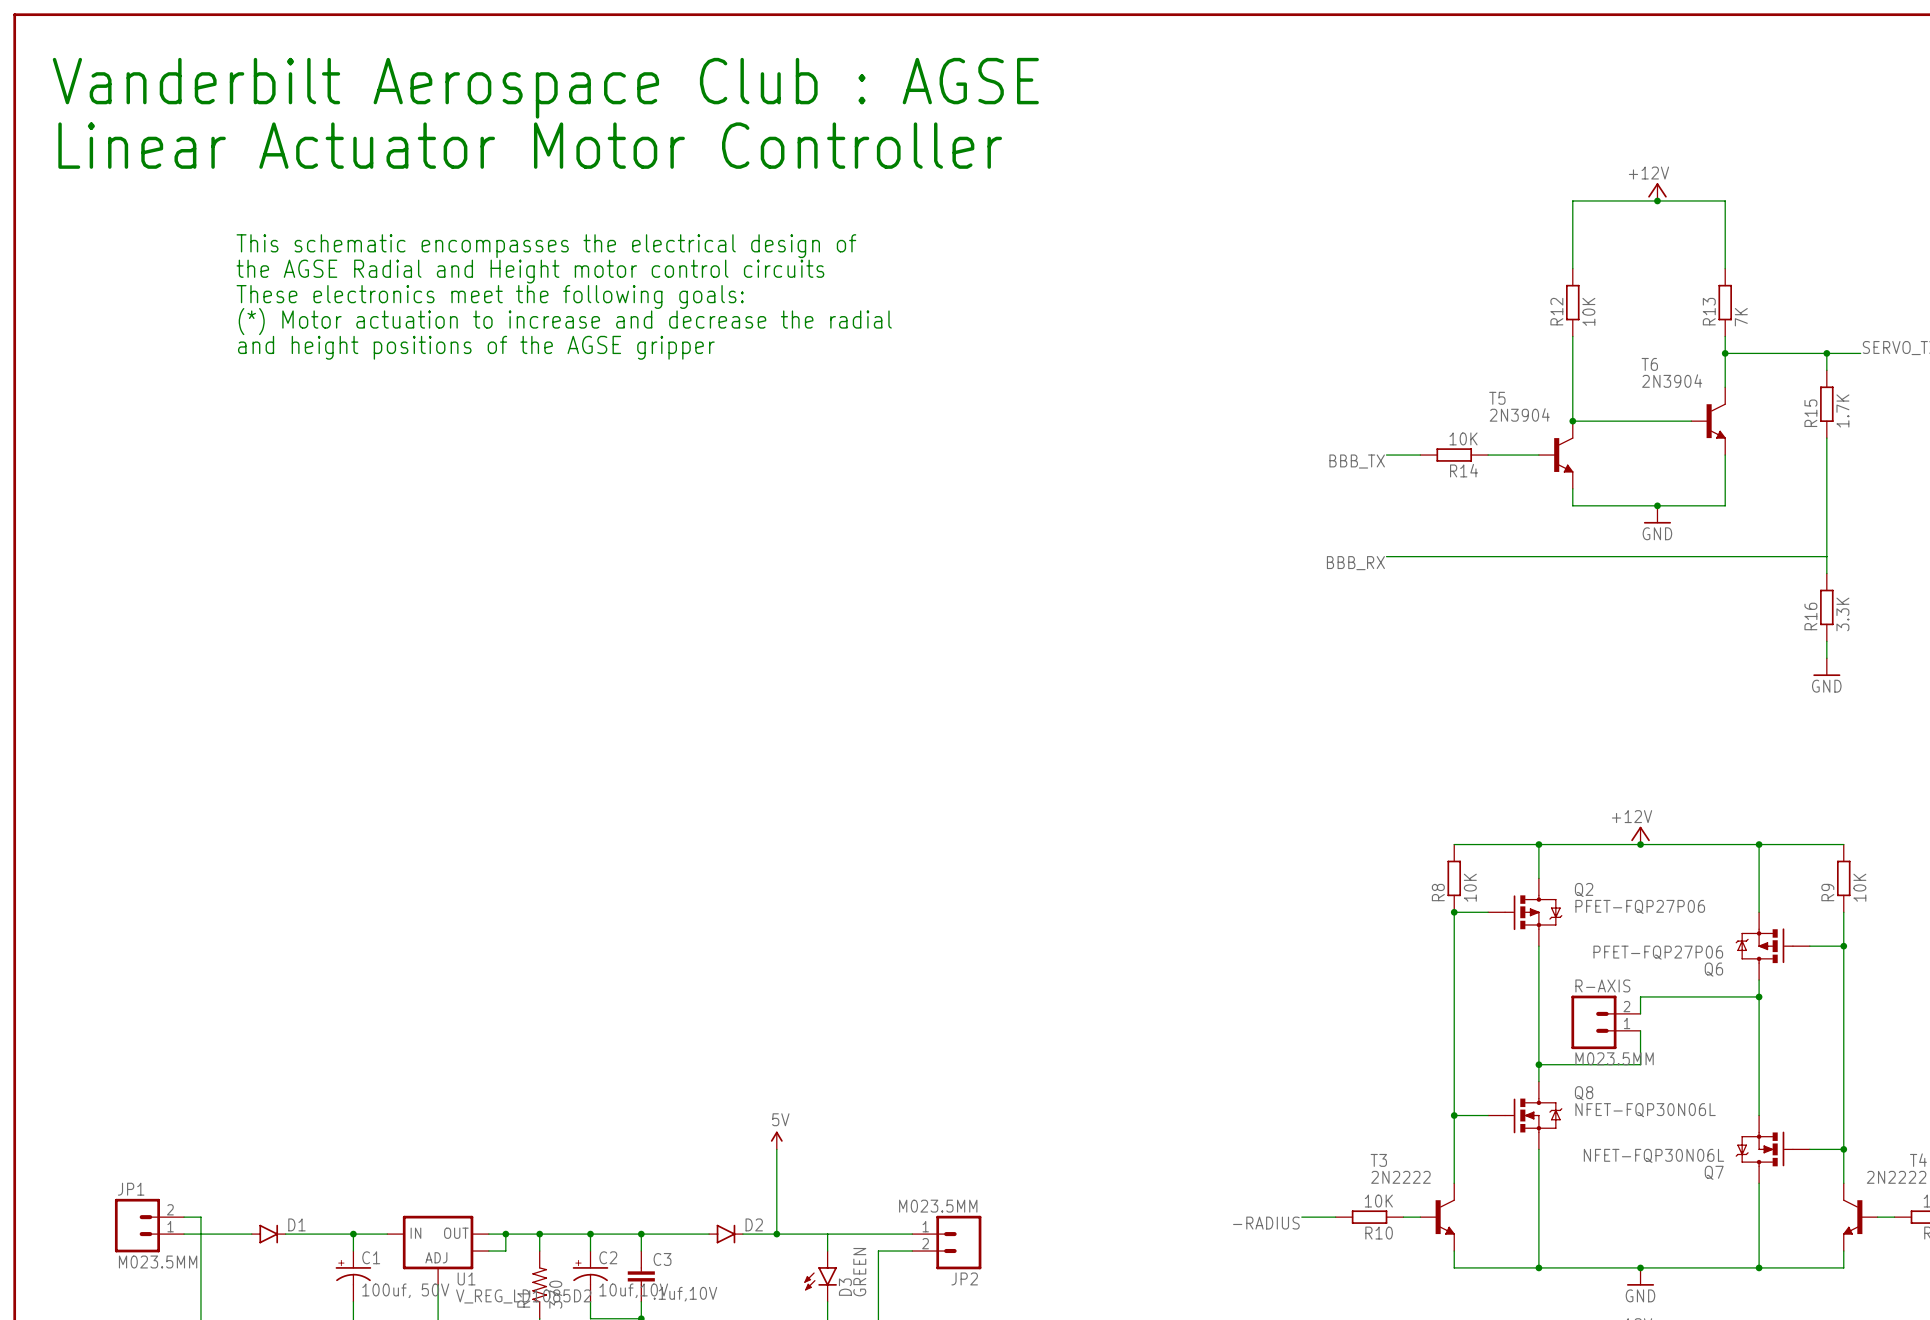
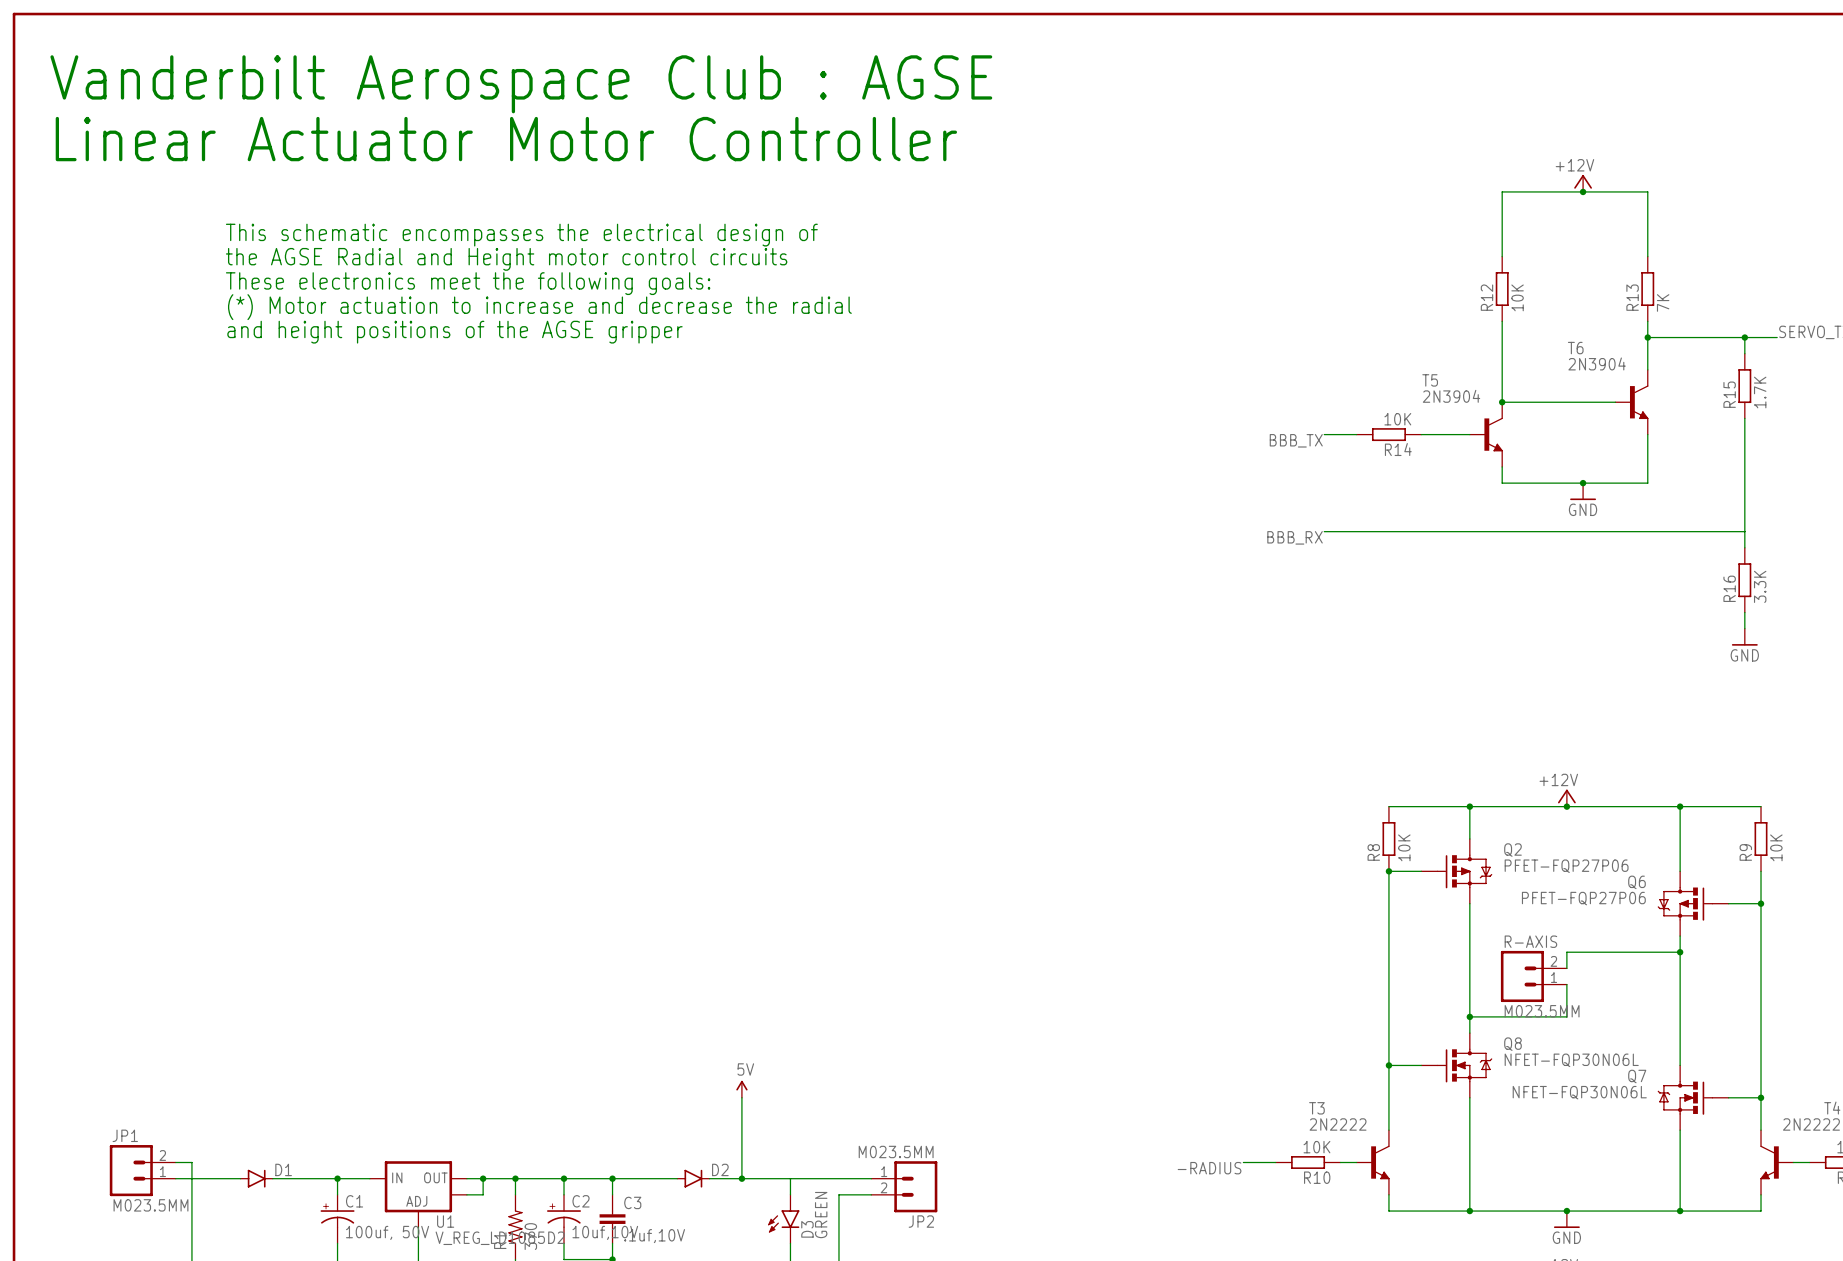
Q6 flip: as is (1764, 945) -> up-down (1685, 903)
Q7 flip: as is (1764, 1149) -> up-down (1685, 1097)

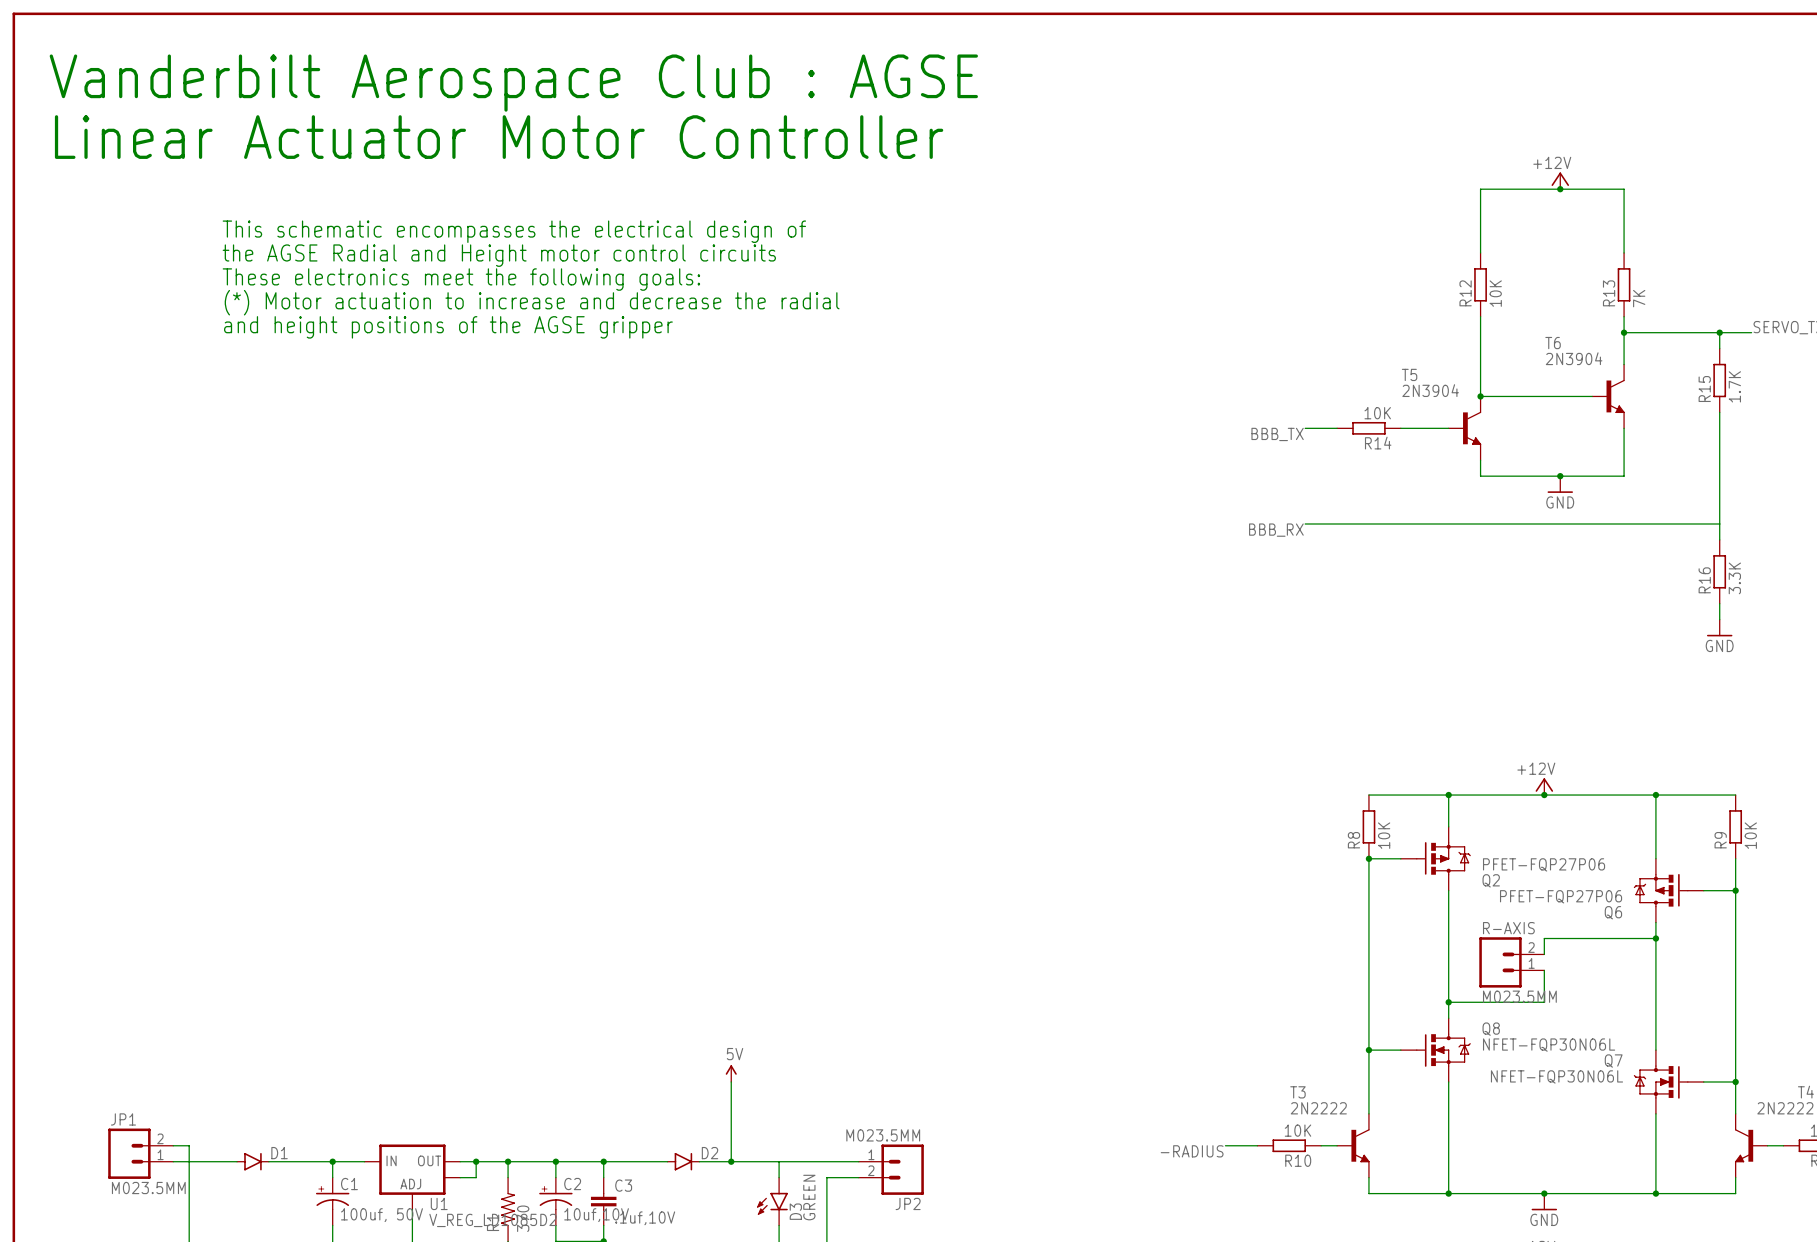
Q2 flip: as is (1464, 871) -> up-down (1443, 858)
Q6 flip: as is (1685, 903) -> up-down (1661, 890)

